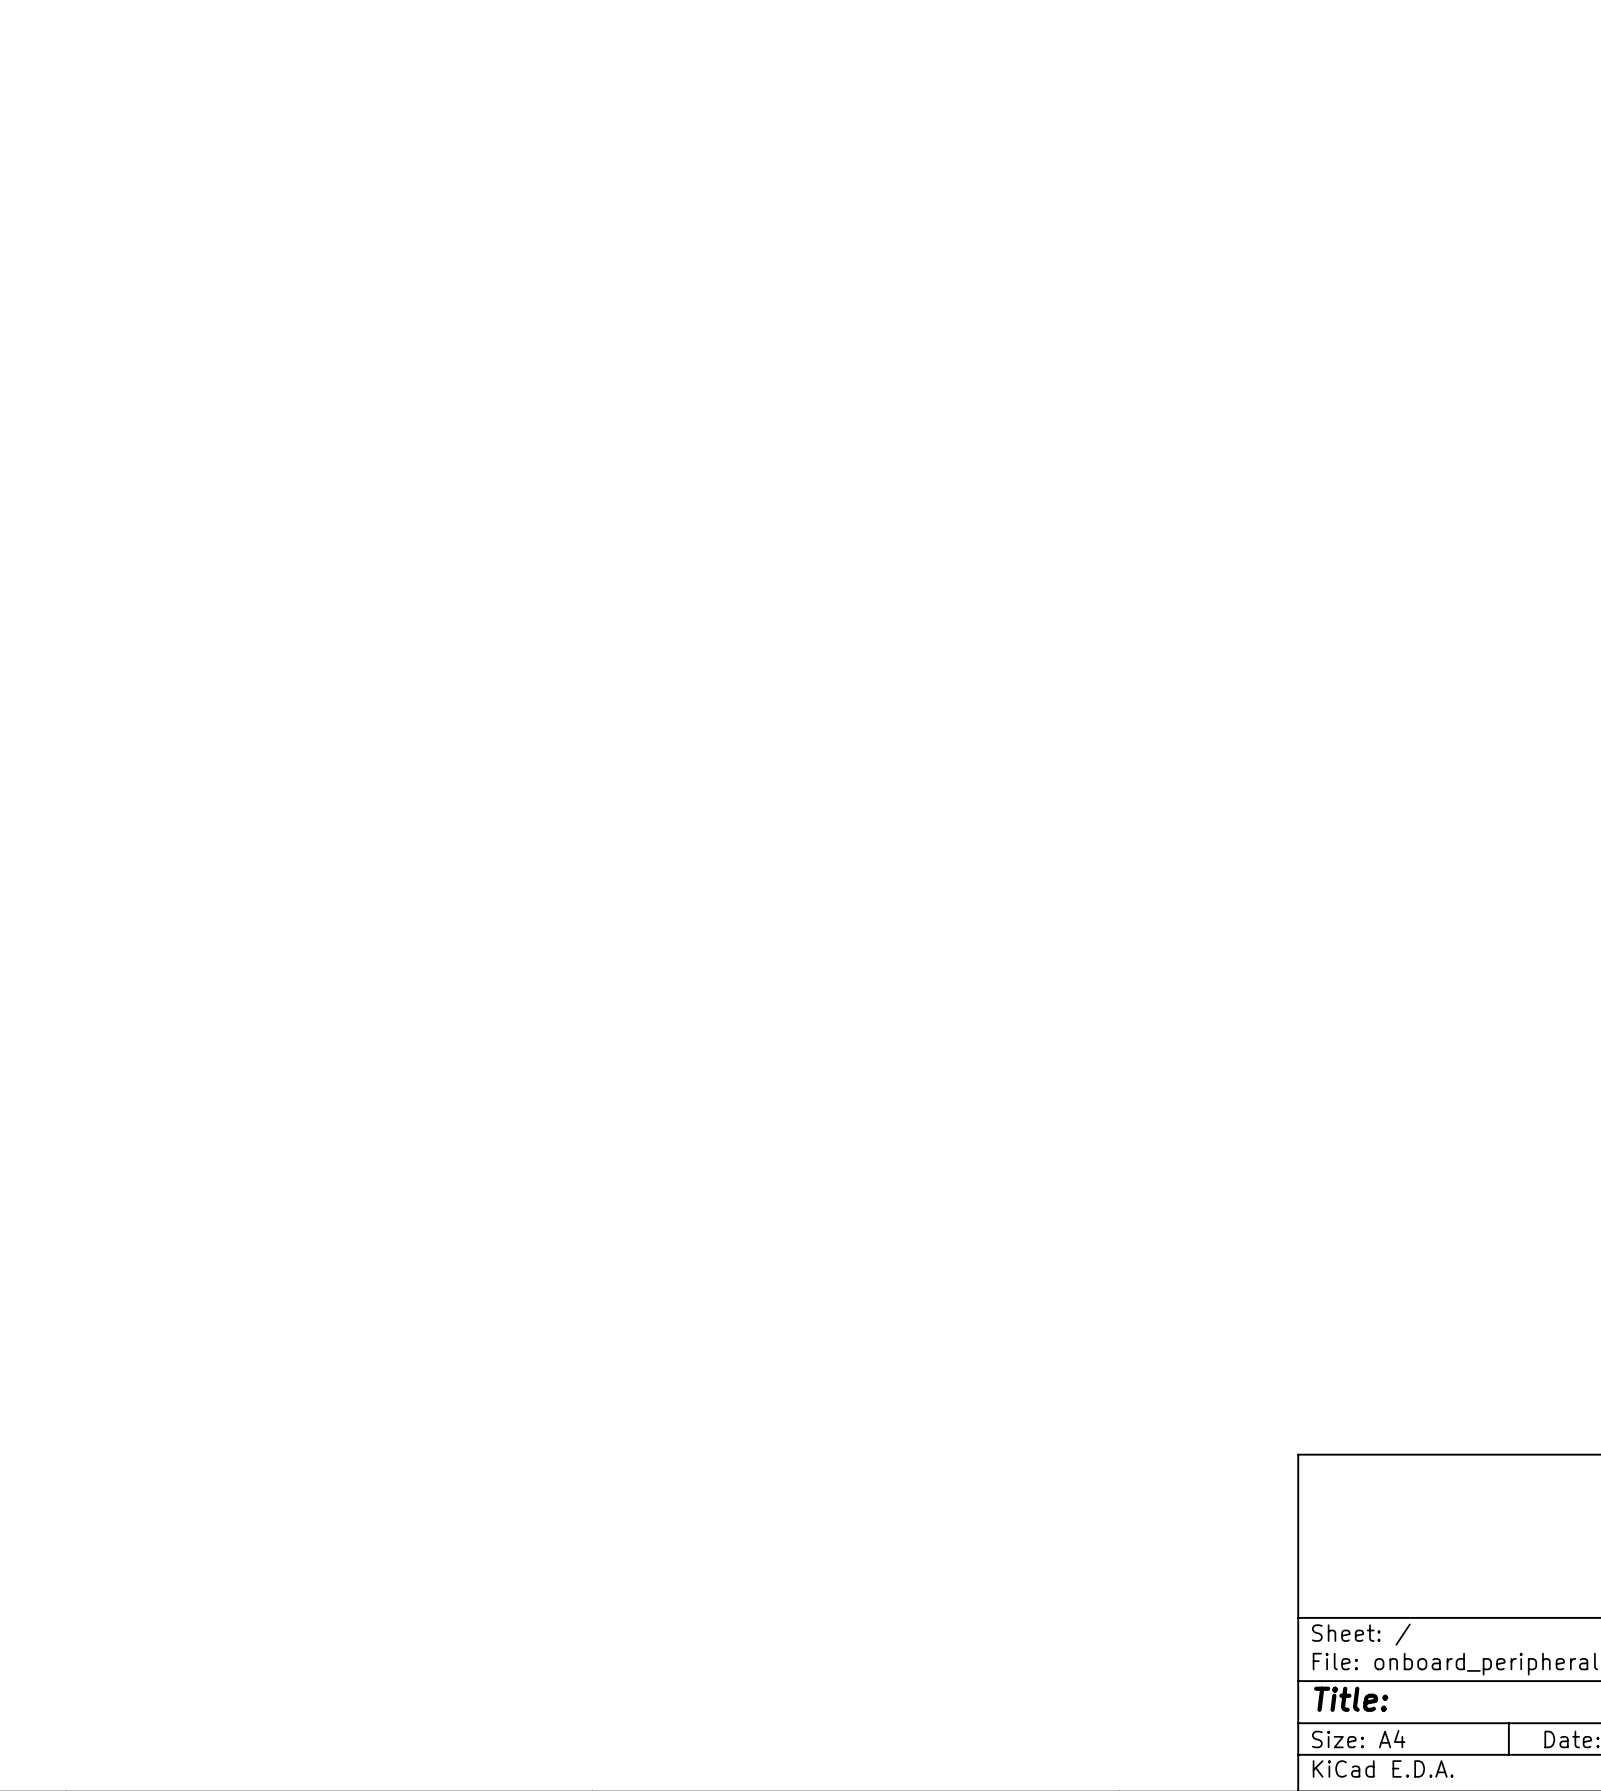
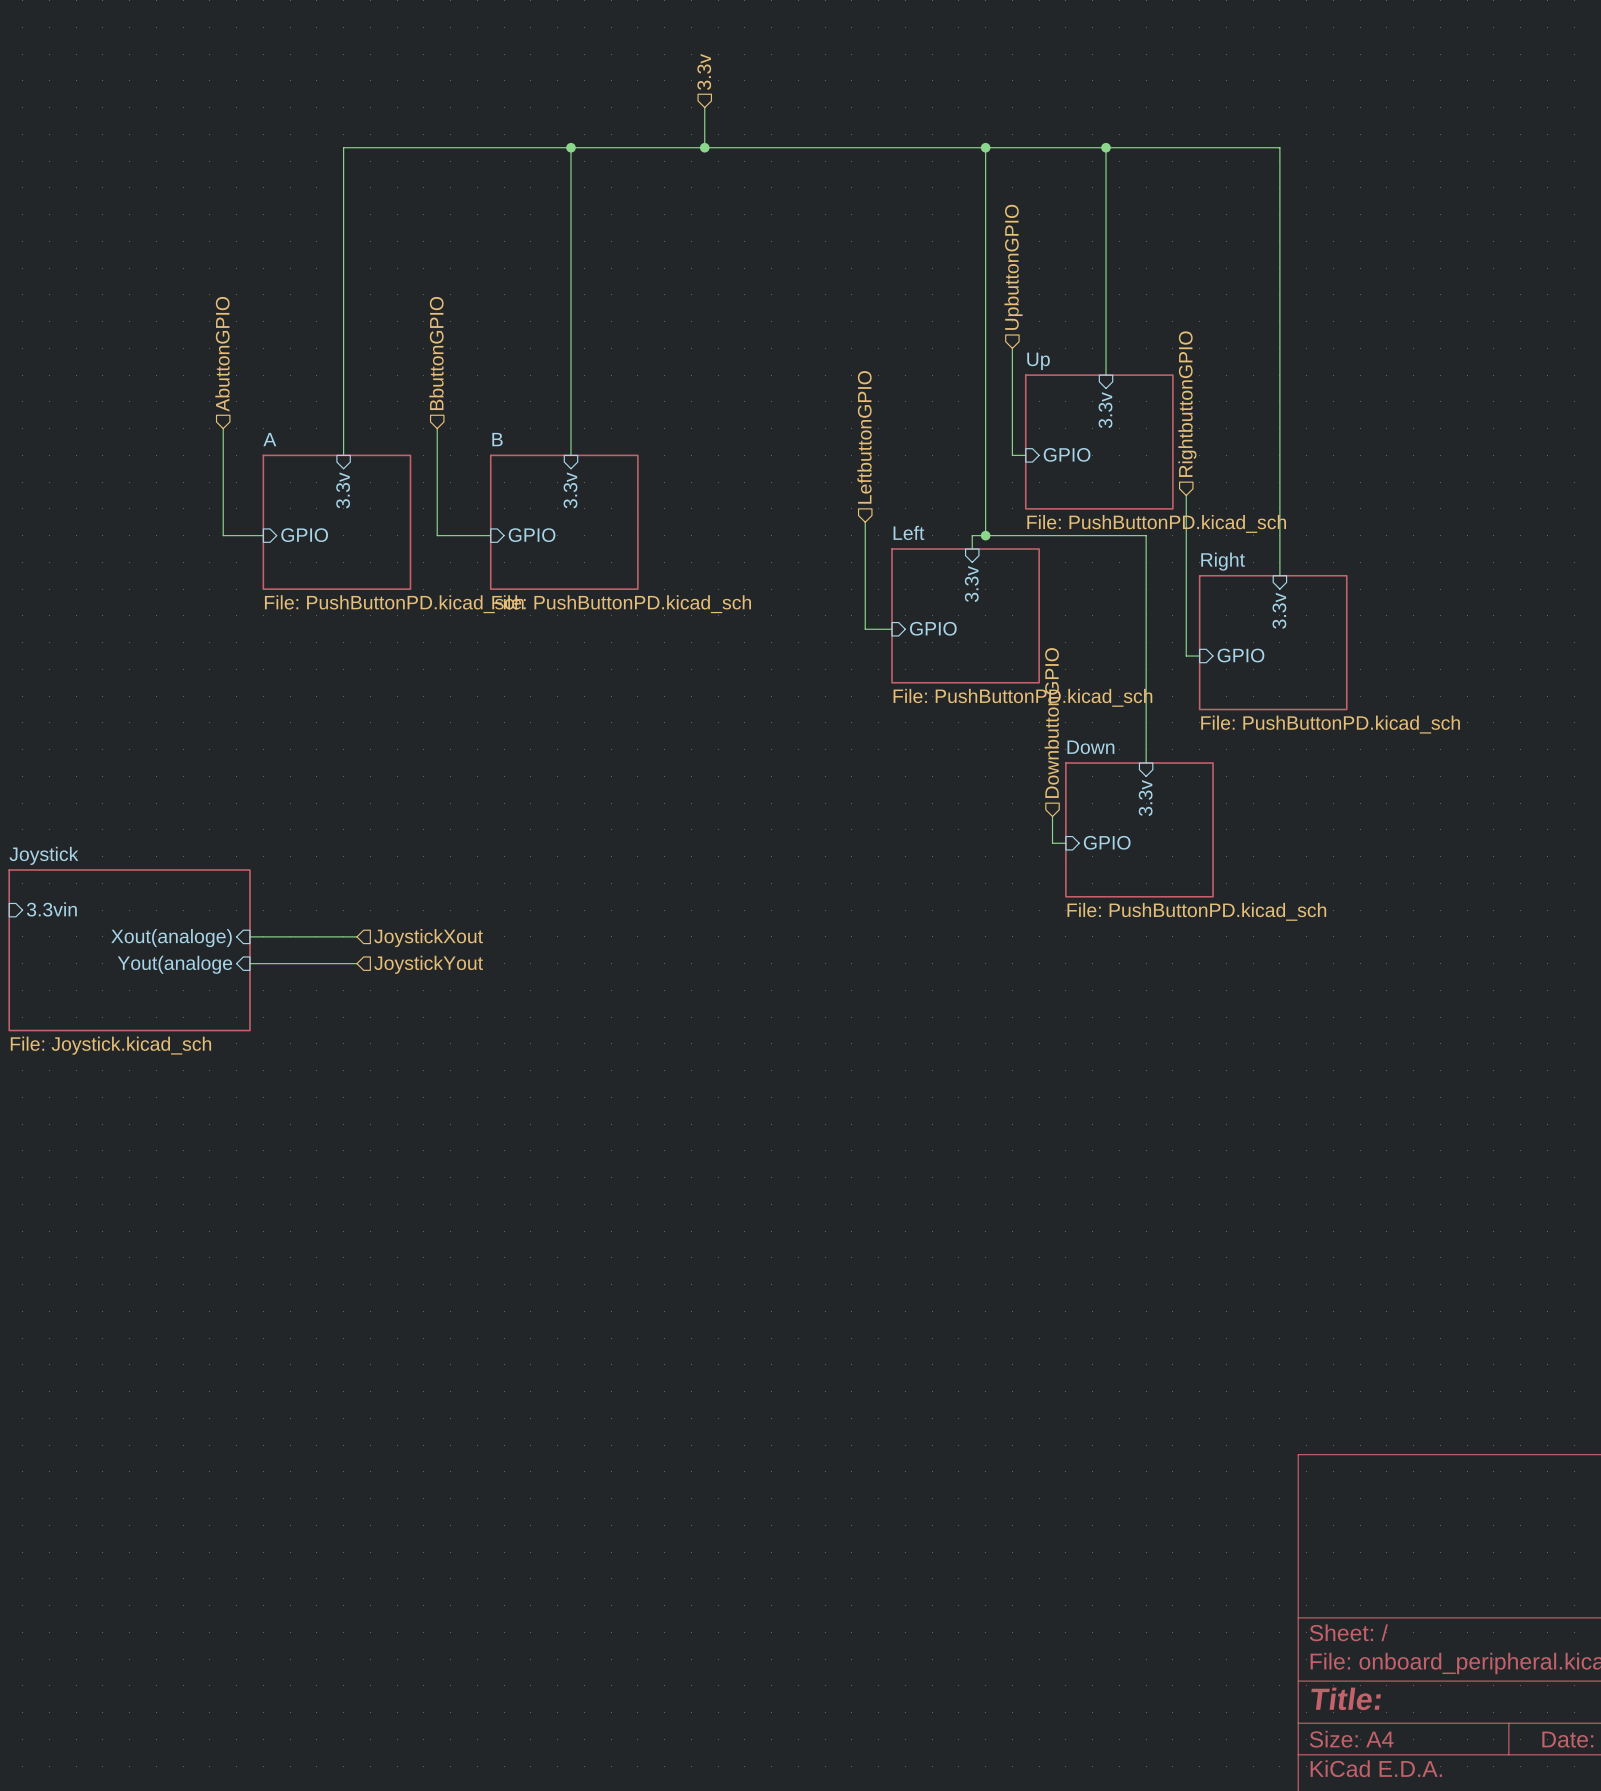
hierarchical label: none -> 3.3v (704, 71)
wire: none -> (704, 107) (704, 147)
wire: none -> (570, 147) (570, 455)
junction: none -> (570, 147)
junction: none -> (704, 147)
wire: none -> (985, 147) (985, 535)
junction: none -> (985, 147)
wire: none -> (1106, 147) (1106, 375)
junction: none -> (1106, 147)
hierarchical label: none -> UpbuttonGPIO (1013, 267)
hierarchical label: none -> BbuttonGPIO (436, 353)
wire: none -> (1012, 348) (1012, 455) (1025, 455)
hierarchical label: none -> AbuttonGPIO (222, 354)
hierarchical label: none -> RightbuttonGPIO (1187, 404)
sheet pin: none -> 3.3v (1105, 410)
wire: none -> (223, 428) (223, 535) (263, 535)
wire: none -> (437, 428) (437, 535) (490, 535)
hierarchical label: none -> LeftbuttonGPIO (864, 437)
sheet Up: none -> File: PushButtonPD.kicad_sch (1099, 442)
sheet pin: none -> GPIO (1067, 454)
wire: none -> (343, 455) (343, 147) (1279, 147) (1279, 575)
sheet pin: none -> 3.3v (343, 490)
sheet pin: none -> 3.3v (570, 490)
wire: none -> (1186, 495) (1186, 656) (1199, 656)
sheet A: none -> File: PushButtonPD.kicad_sch (336, 522)
sheet B: none -> File: PushButtonPD.kicad_sch (564, 522)
wire: none -> (865, 522) (865, 629) (892, 629)
sheet pin: none -> GPIO (304, 535)
sheet pin: none -> GPIO (532, 535)
junction: none -> (985, 535)
wire: none -> (972, 549) (972, 535) (1146, 535) (1146, 763)
sheet pin: none -> 3.3v (971, 584)
sheet pin: none -> 3.3v (1279, 610)
sheet Left: none -> File: PushButtonPD.kicad_sch (965, 615)
sheet pin: none -> GPIO (933, 628)
sheet Right: none -> File: PushButtonPD.kicad_sch (1273, 642)
sheet pin: none -> GPIO (1240, 655)
hierarchical label: none -> DownbuttonGPIO (1051, 723)
sheet pin: none -> 3.3v (1145, 798)
wire: none -> (1052, 816) (1052, 843) (1065, 843)
sheet Down: none -> File: PushButtonPD.kicad_sch (1139, 829)
sheet pin: none -> GPIO (1107, 842)
sheet pin: none -> 3.3vin (51, 909)
wire: none -> (249, 936) (356, 936)
sheet pin: none -> Xout(analoge) (171, 938)
hierarchical label: none -> JoystickXout (428, 938)
sheet Joystick: none -> File: Joystick.kicad_sch (129, 950)
wire: none -> (249, 963) (356, 963)
sheet pin: none -> Yout(analoge (174, 964)
hierarchical label: none -> JoystickYout (428, 964)

